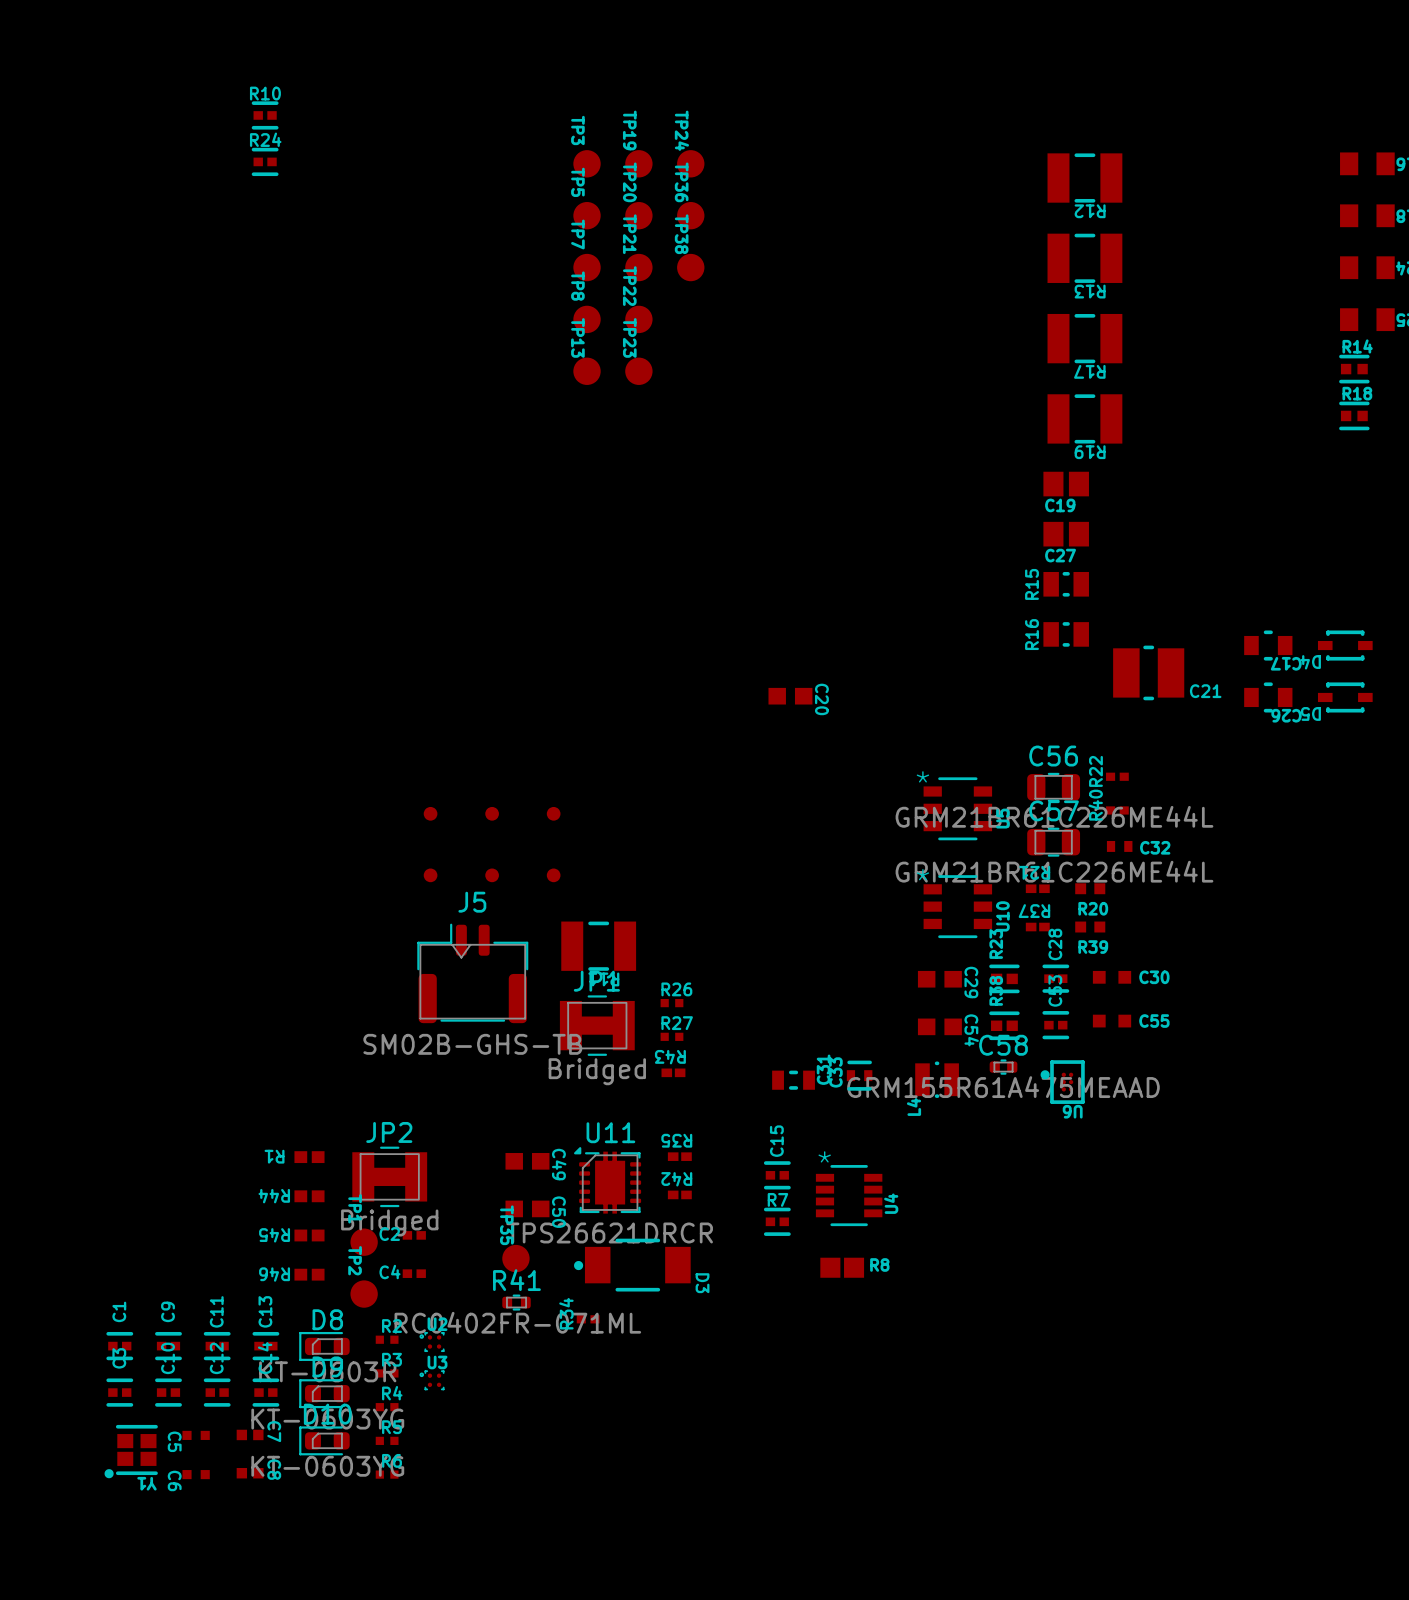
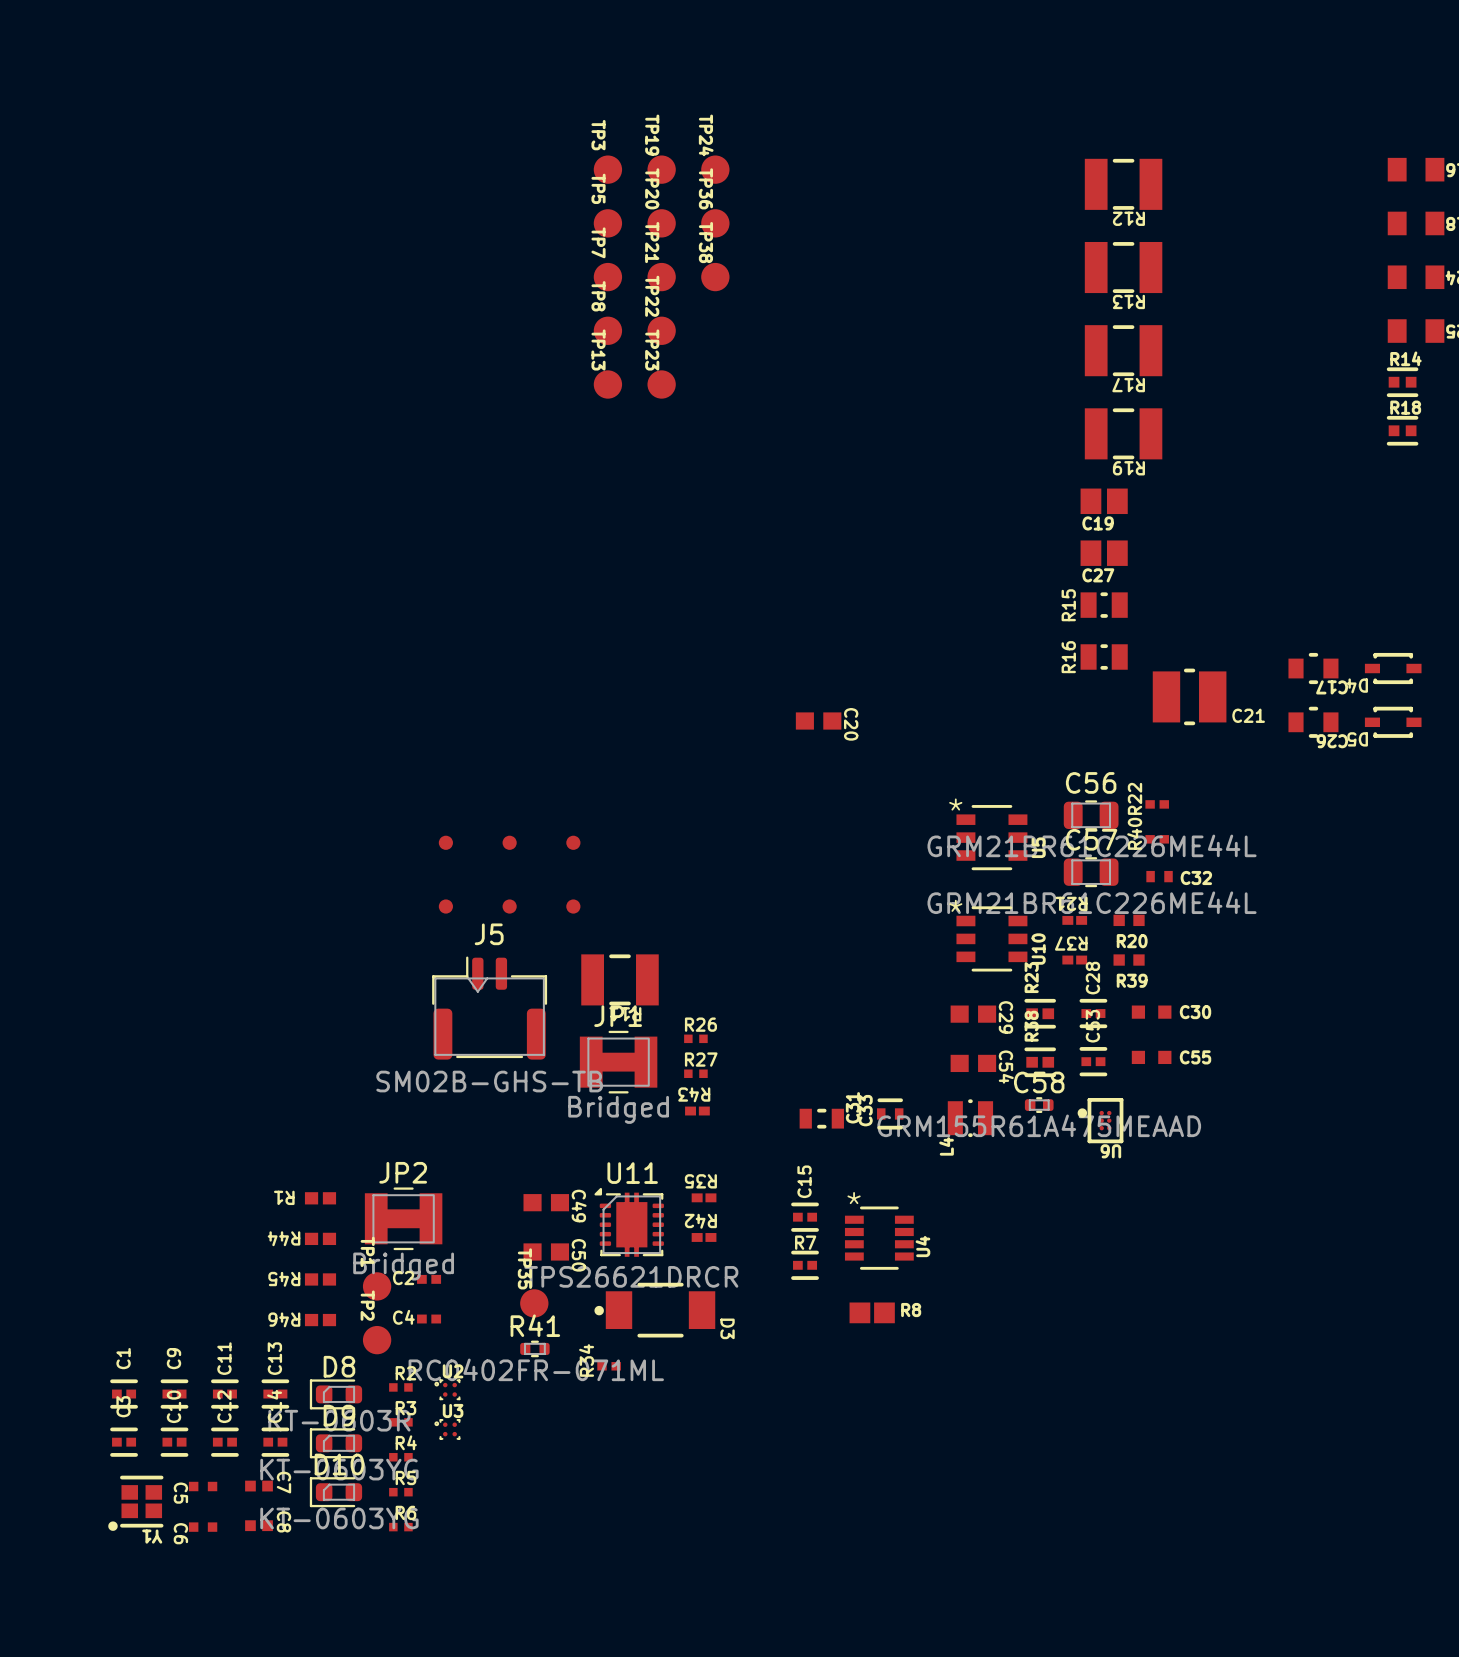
R10: (265, 115) -> none
R24: (265, 161) -> none

